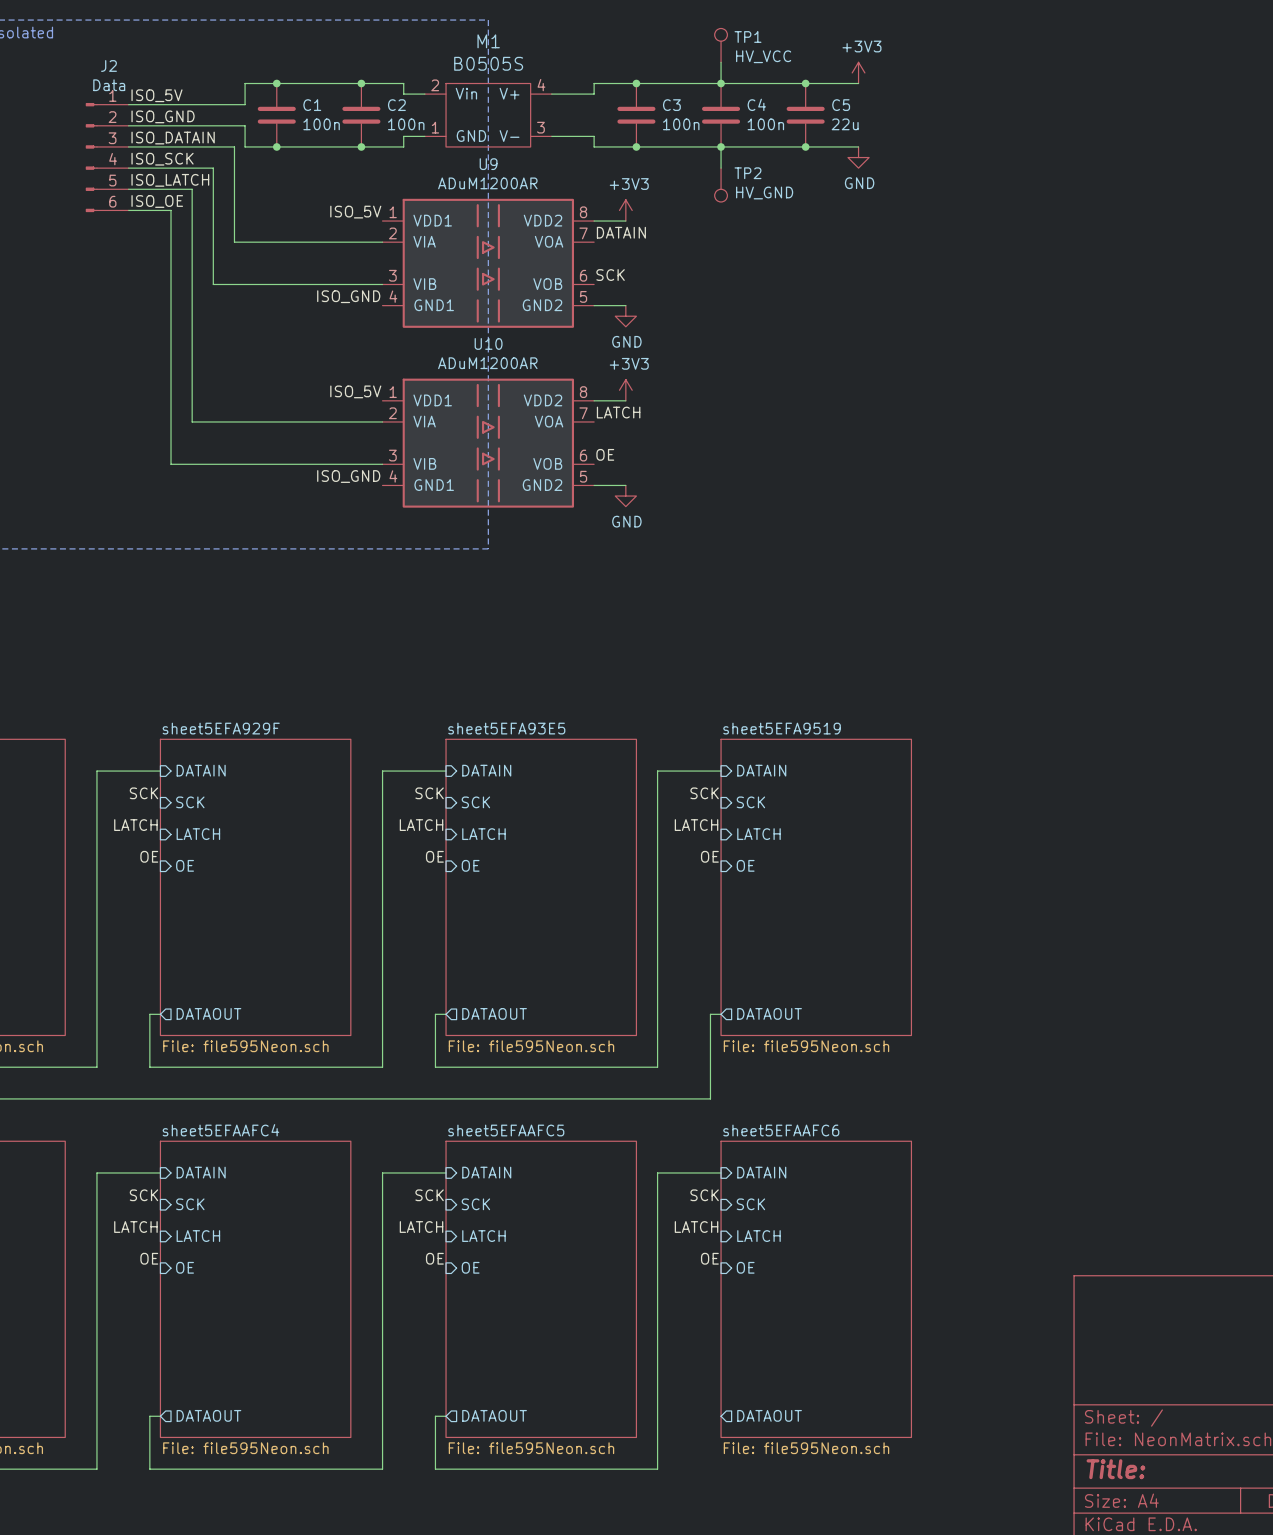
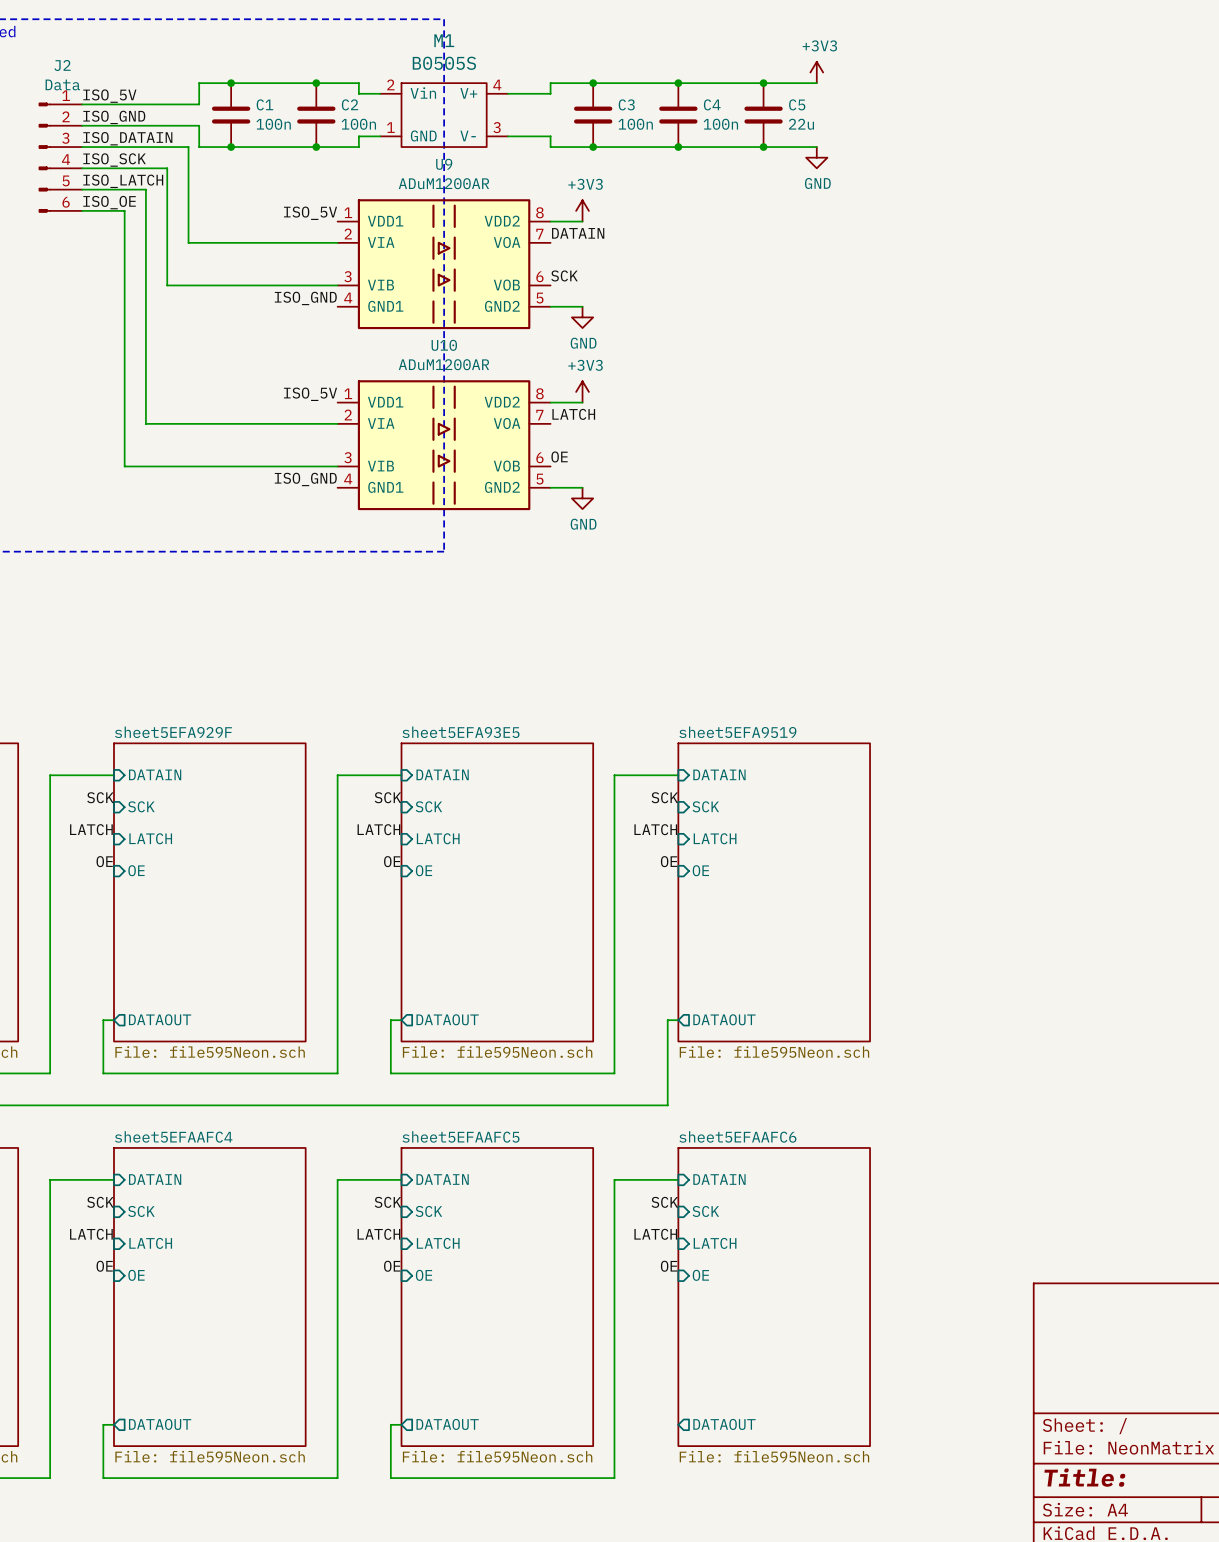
TP1: HV_VCC (721, 45) -> none
wire: (721, 62) (721, 83) -> none
wire: (721, 146) (721, 168) -> none
TP2: HV_GND (721, 185) -> none

